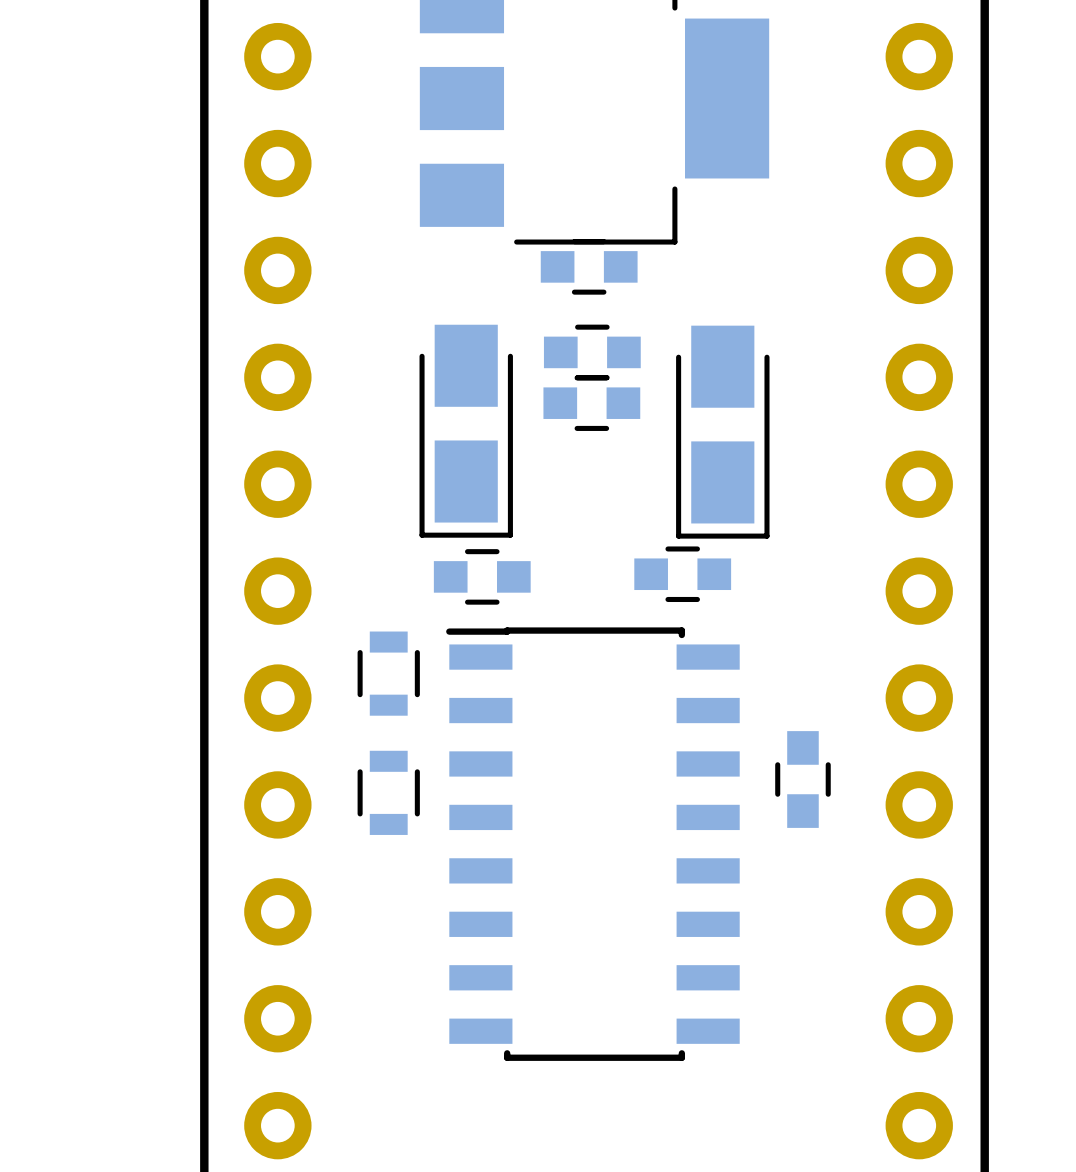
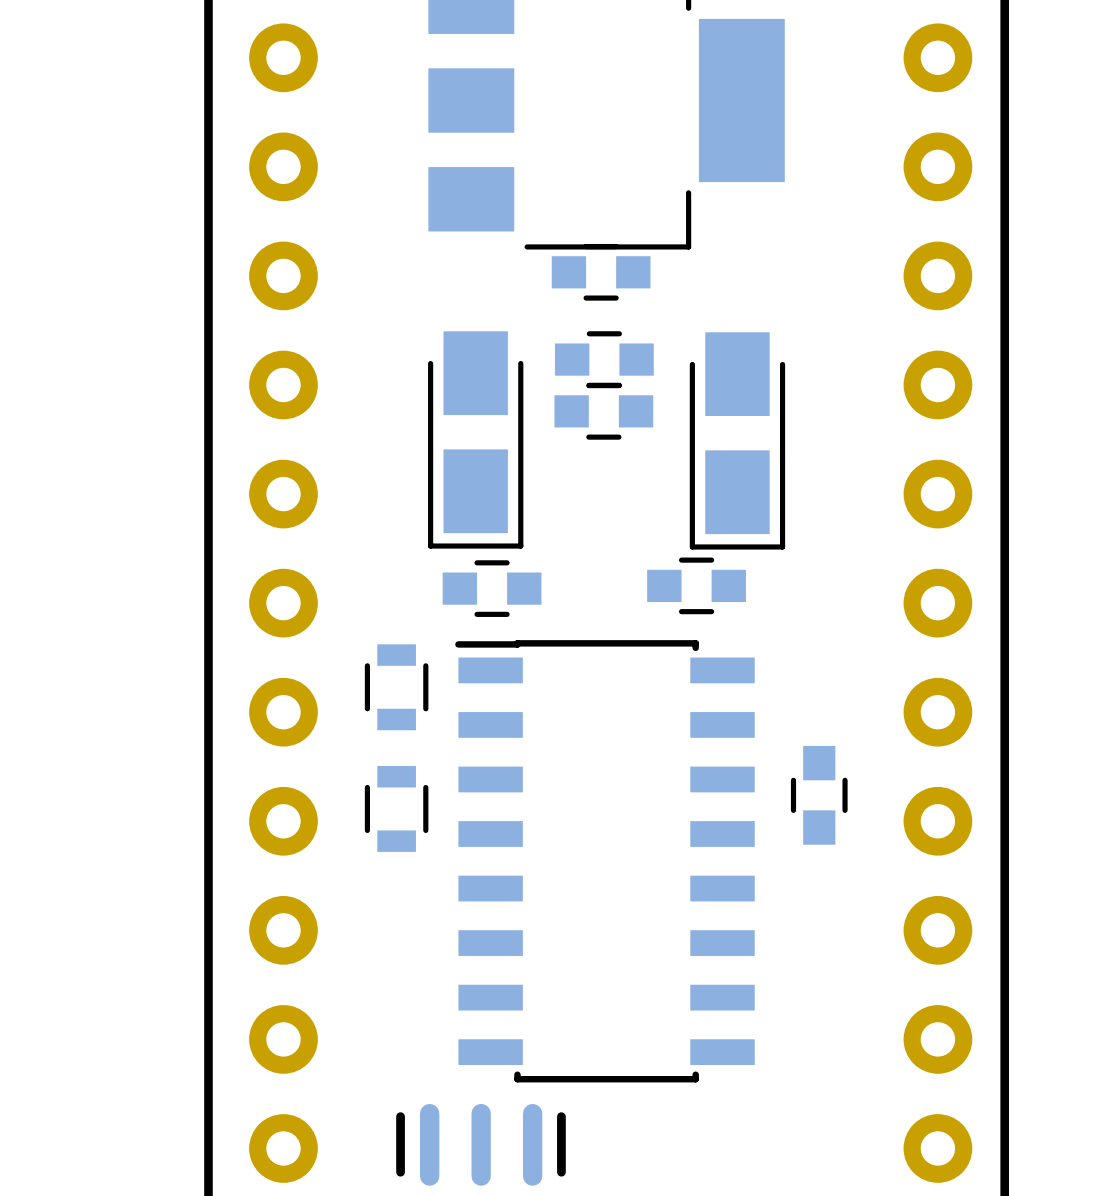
part: none -> (480, 1144)

